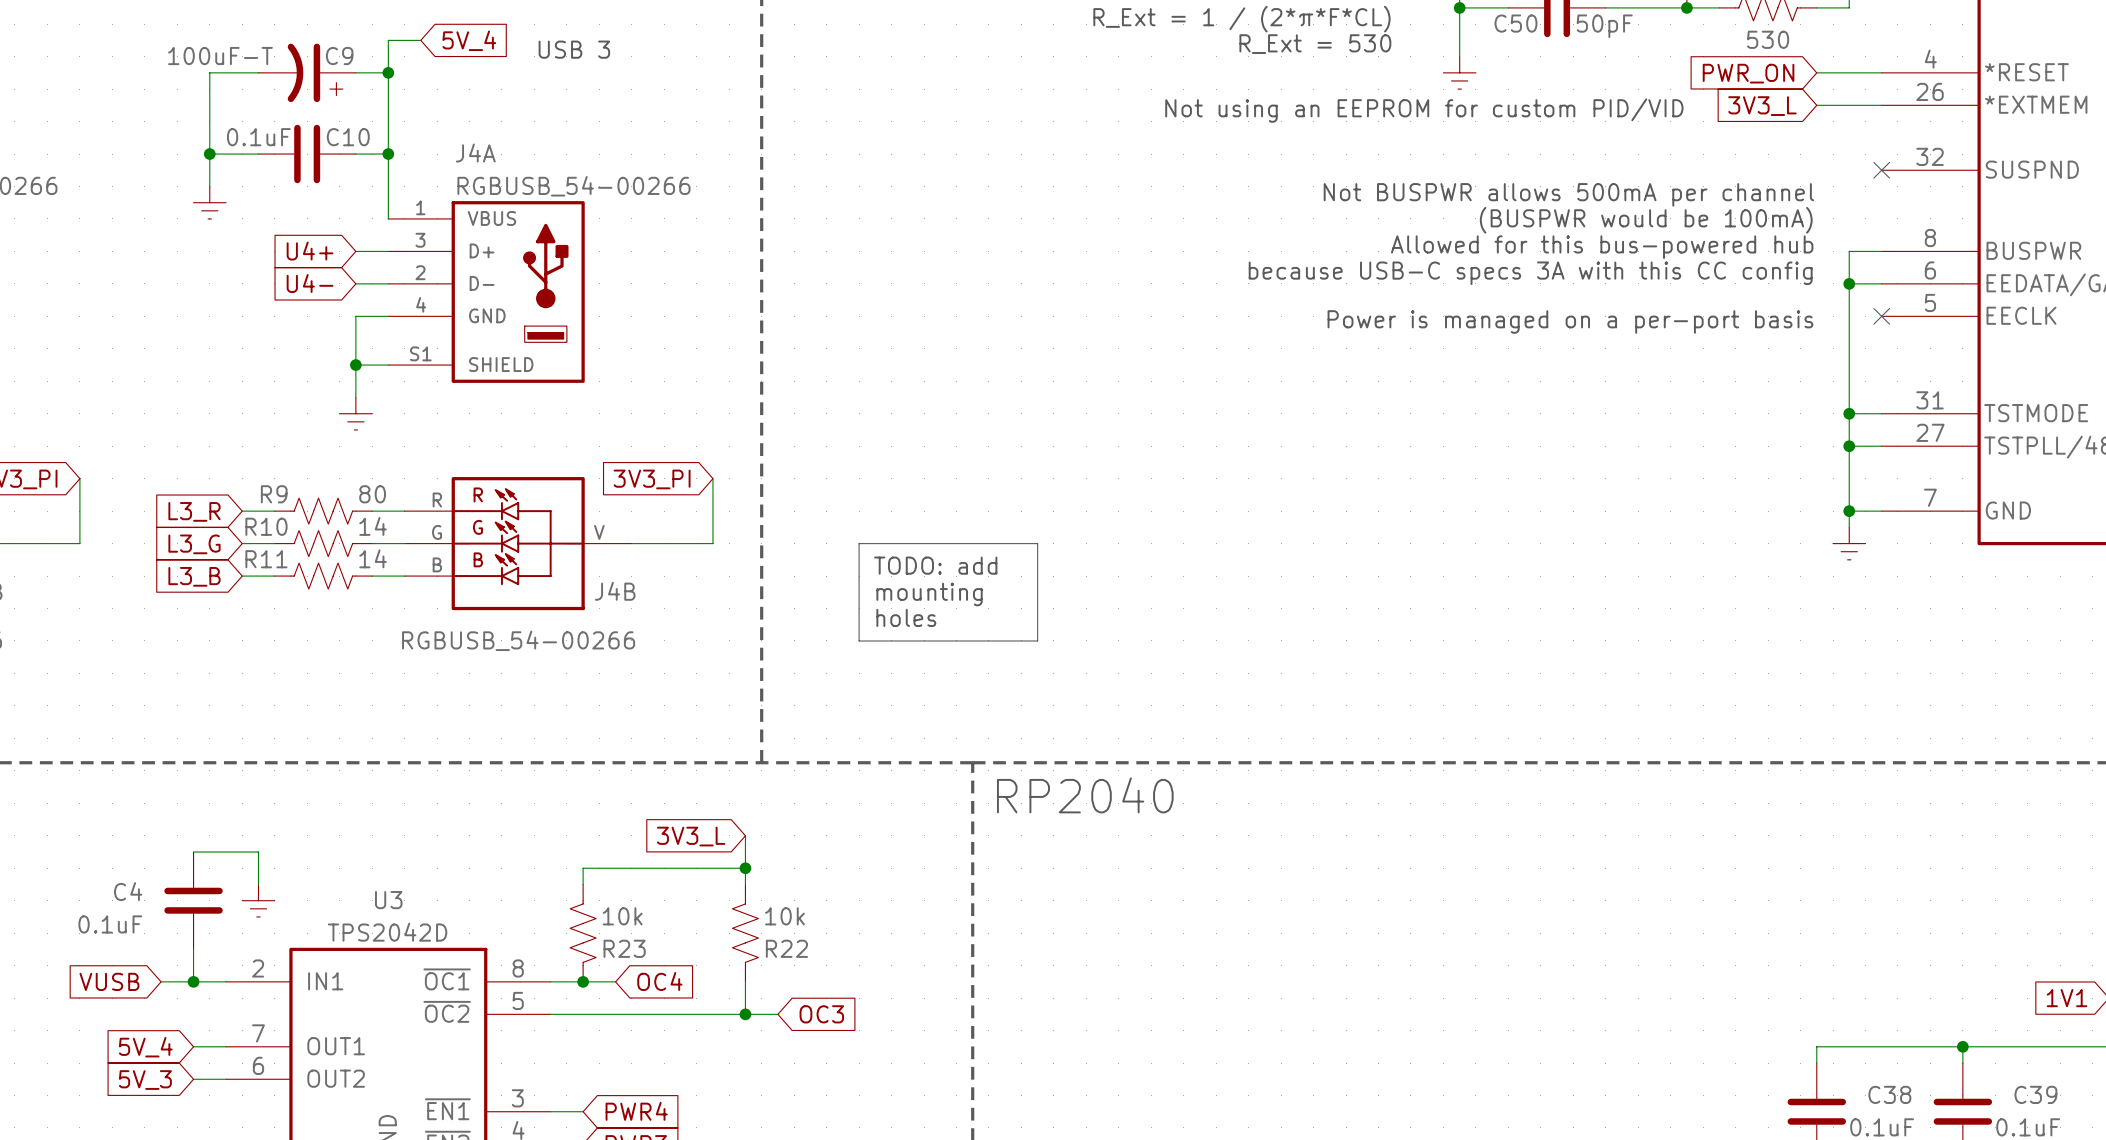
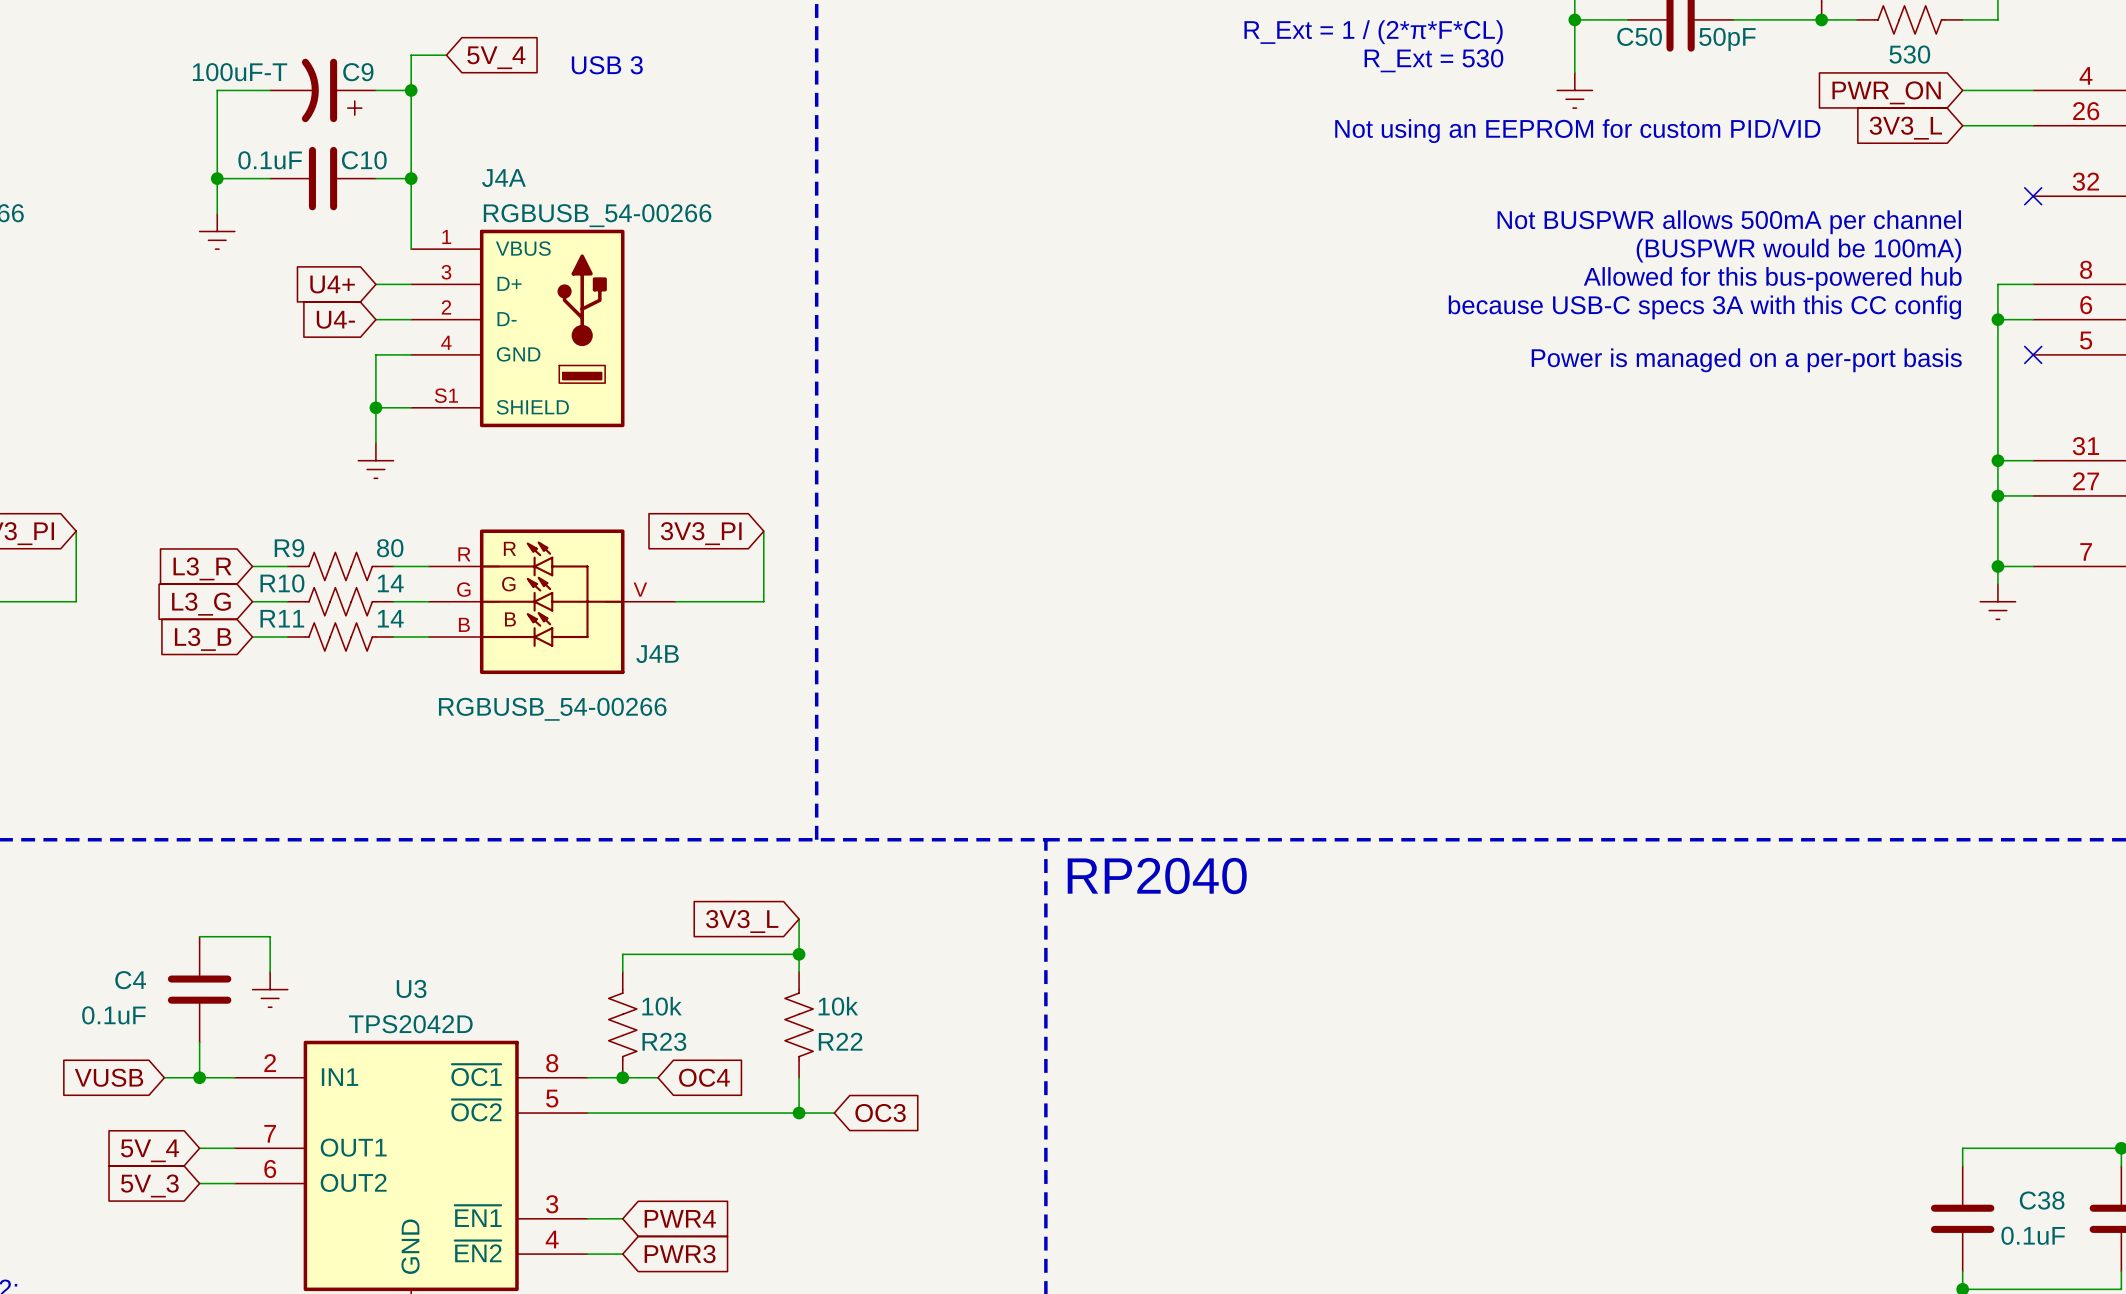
line: (859, 543) (1037, 543) (1037, 640) (859, 640) (859, 543) -> none
text: TODO: add (935, 565) -> none
text: mounting (929, 594) -> none
text: holes (906, 617) -> none

